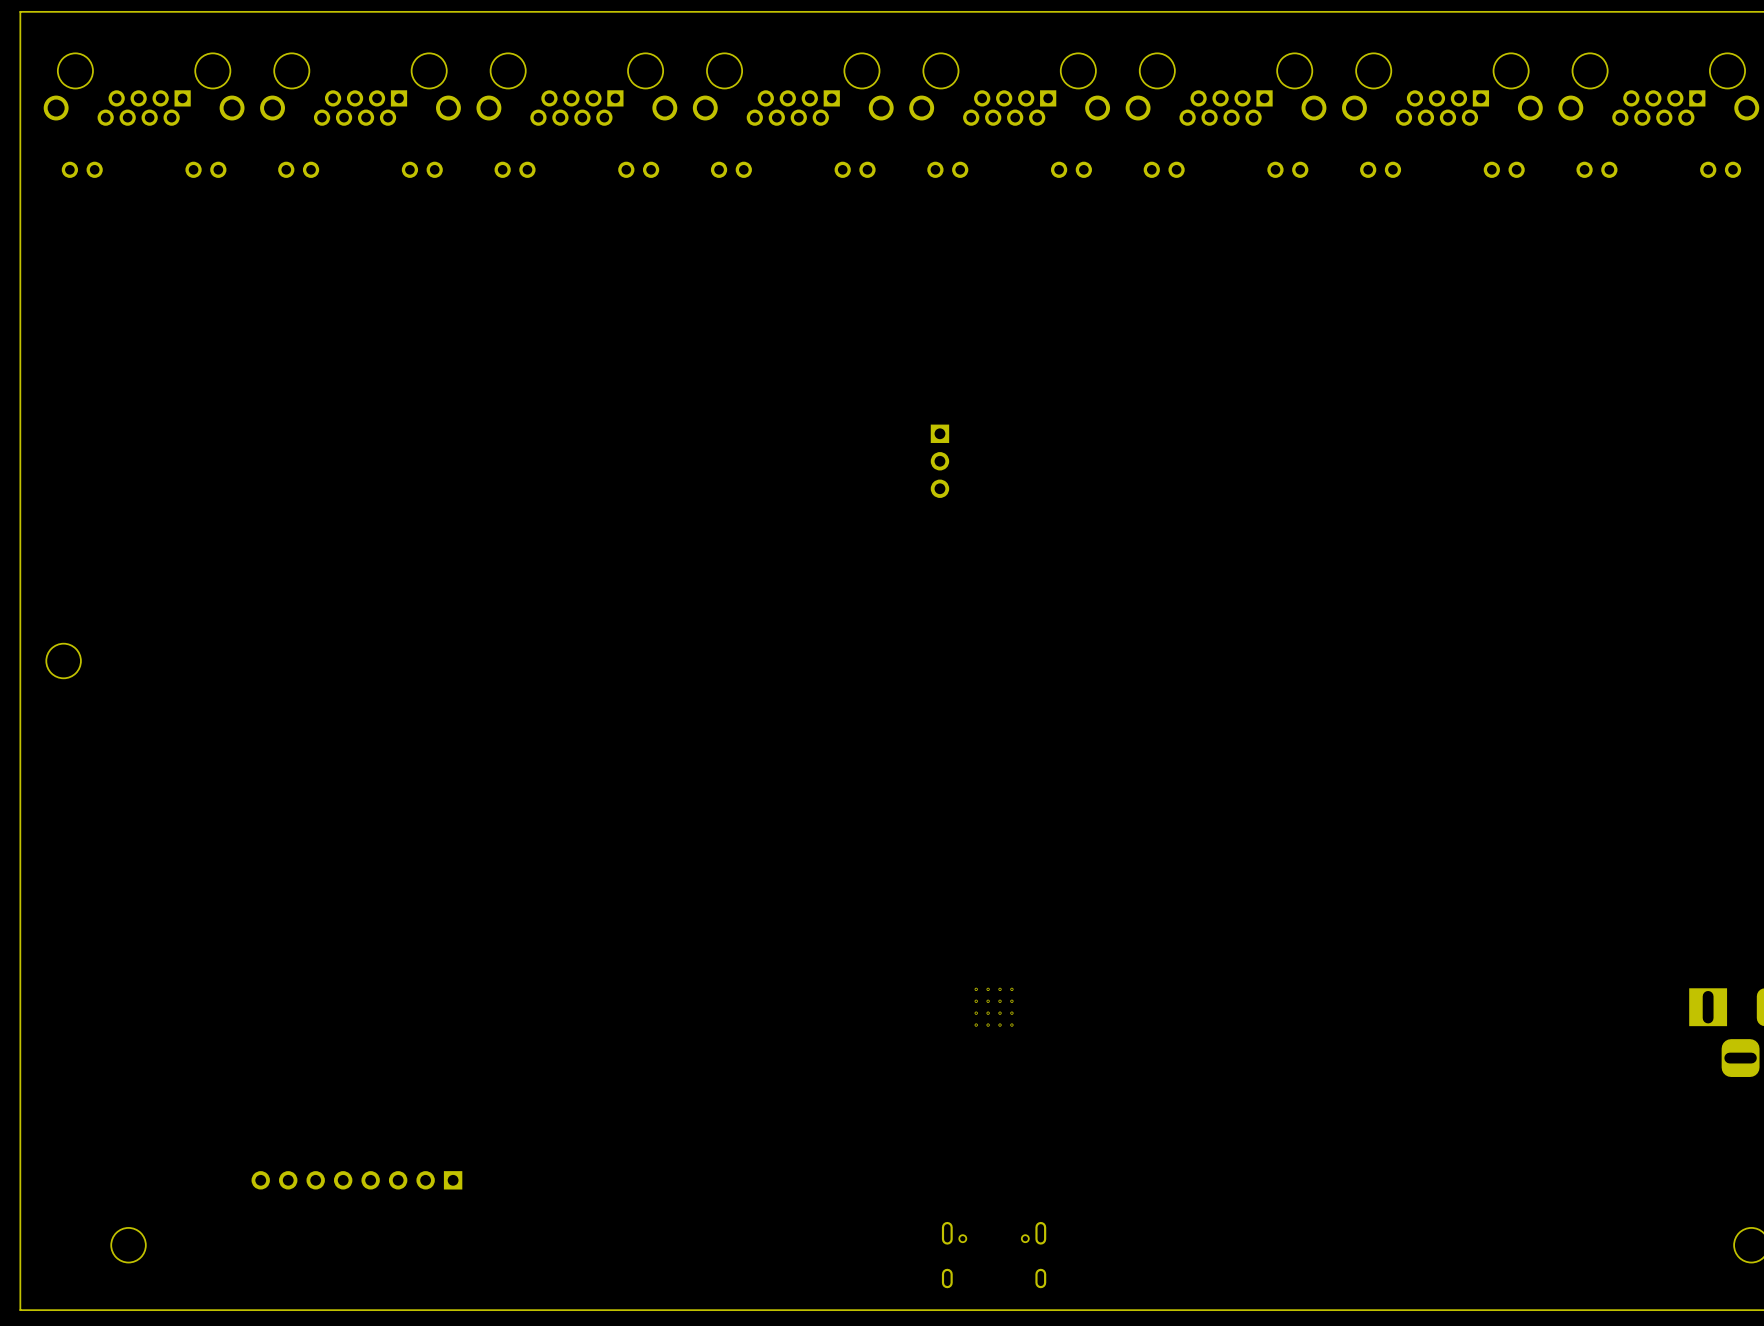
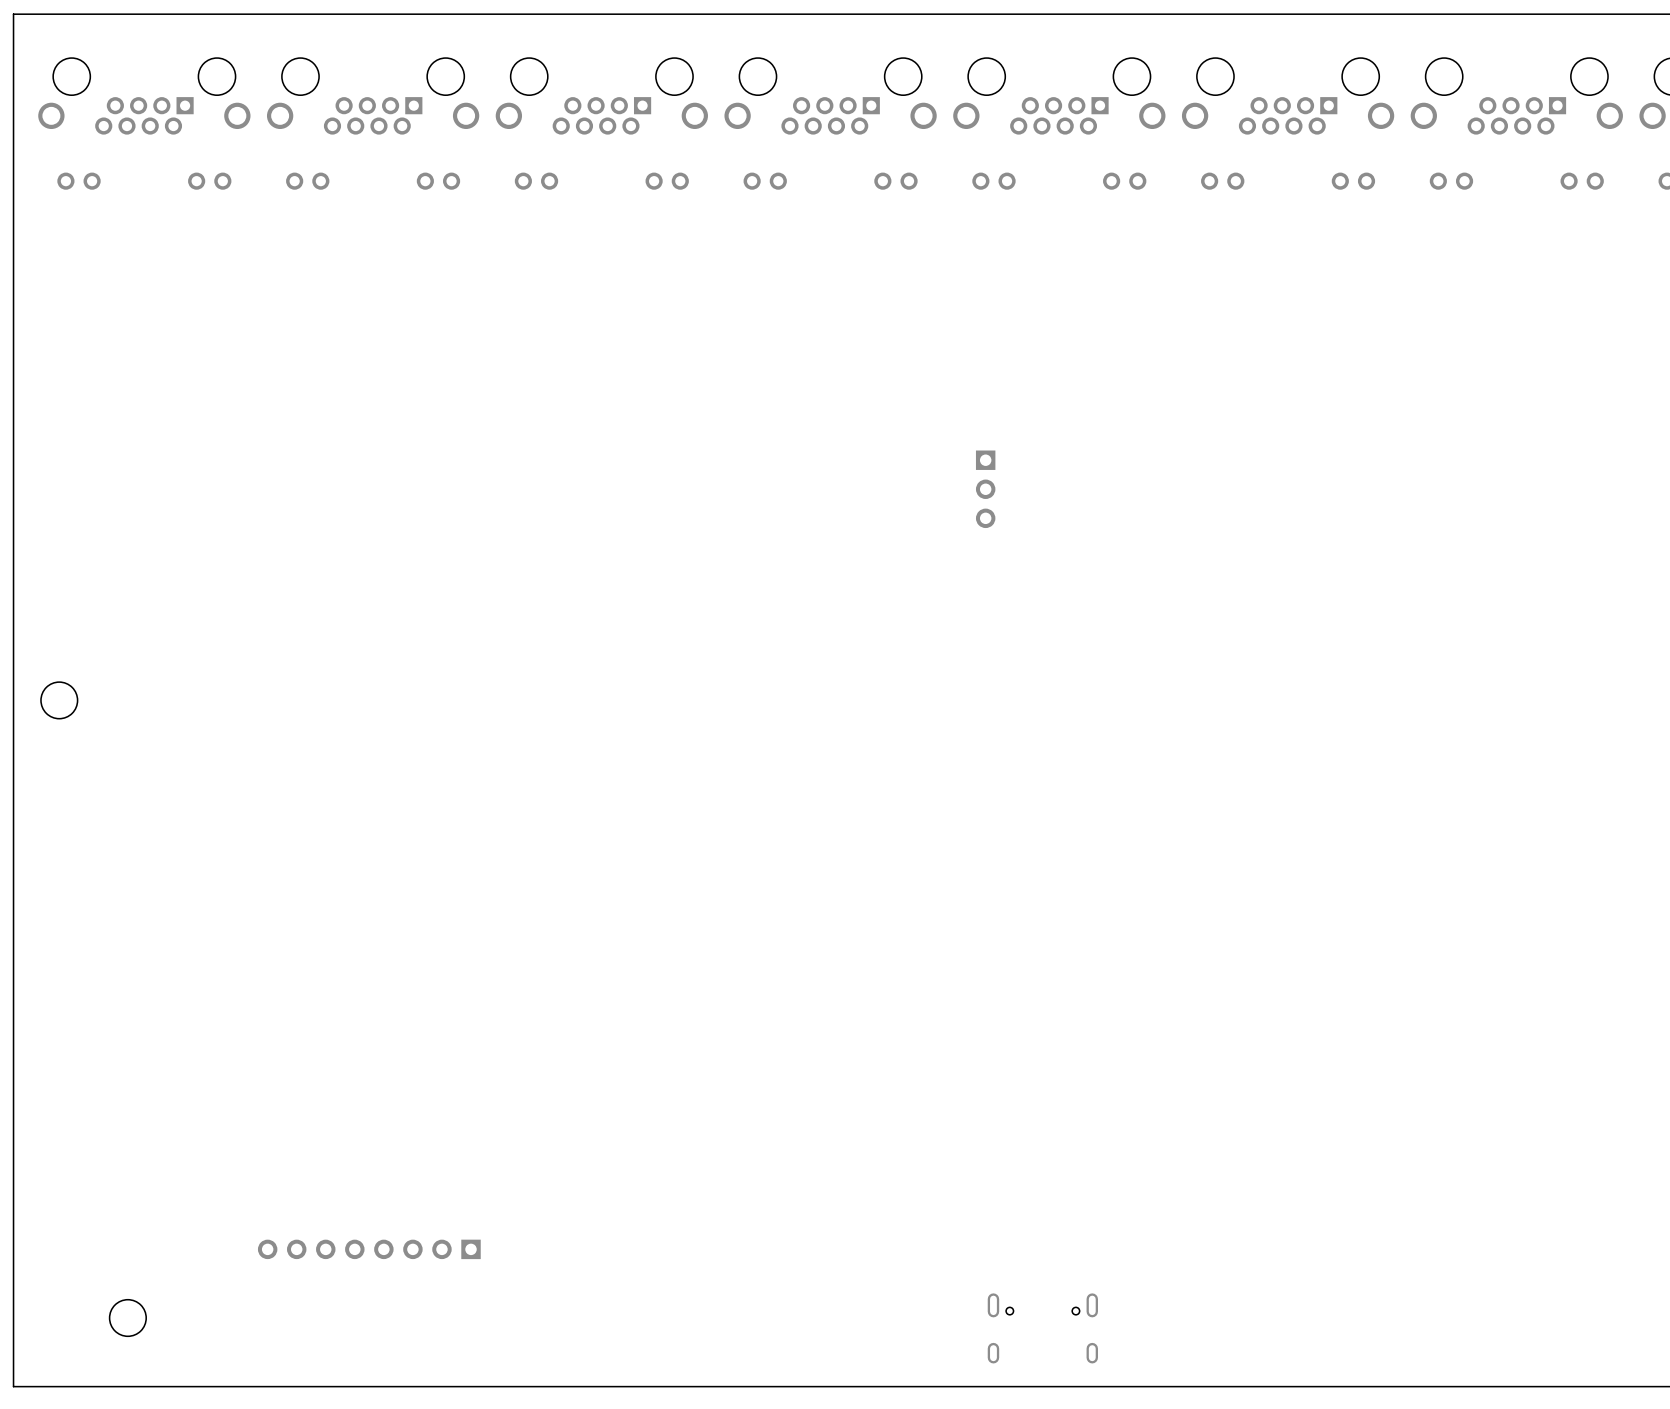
part: (994, 1007) -> none

